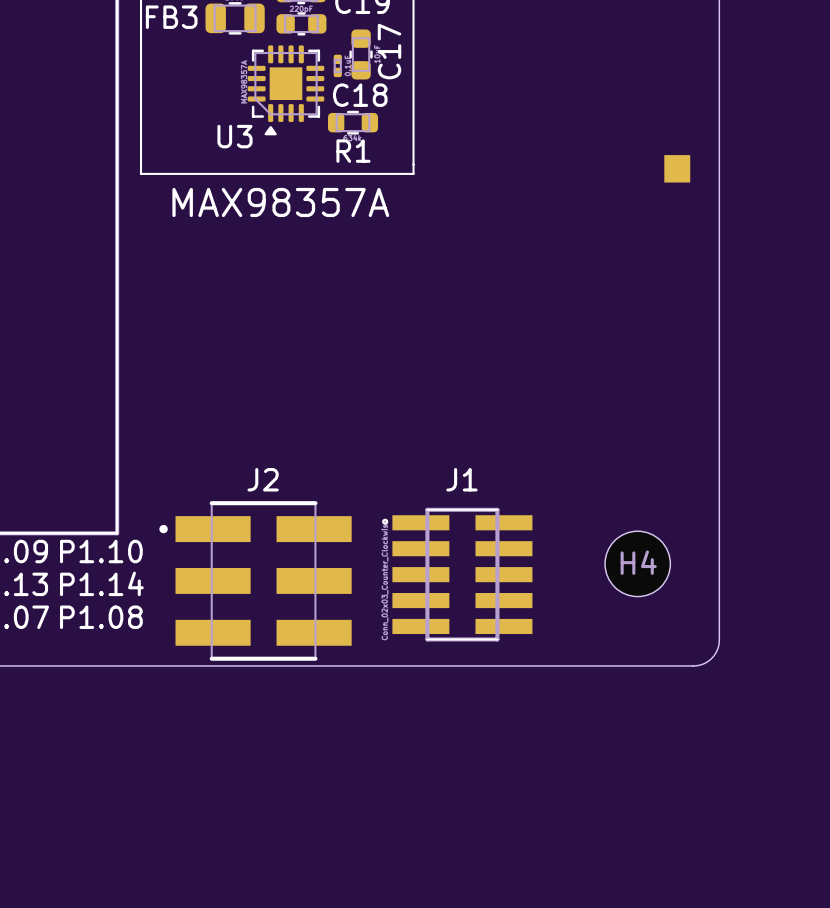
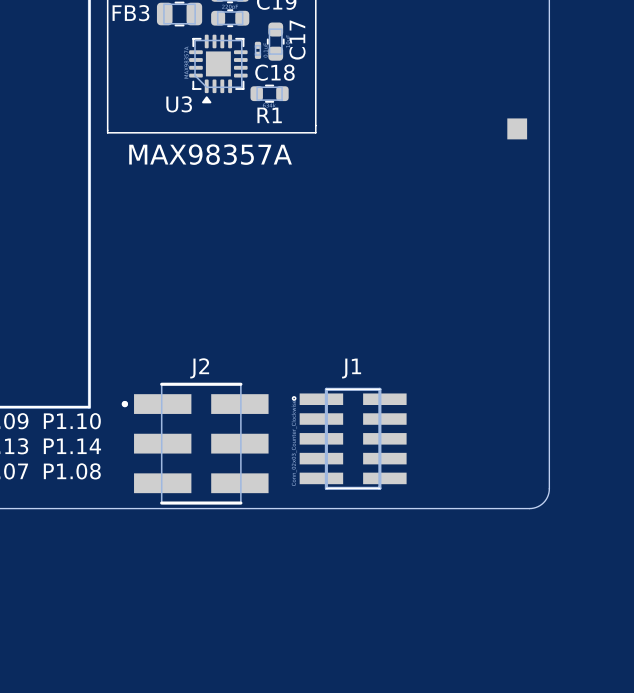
H4: (637, 563) -> none

